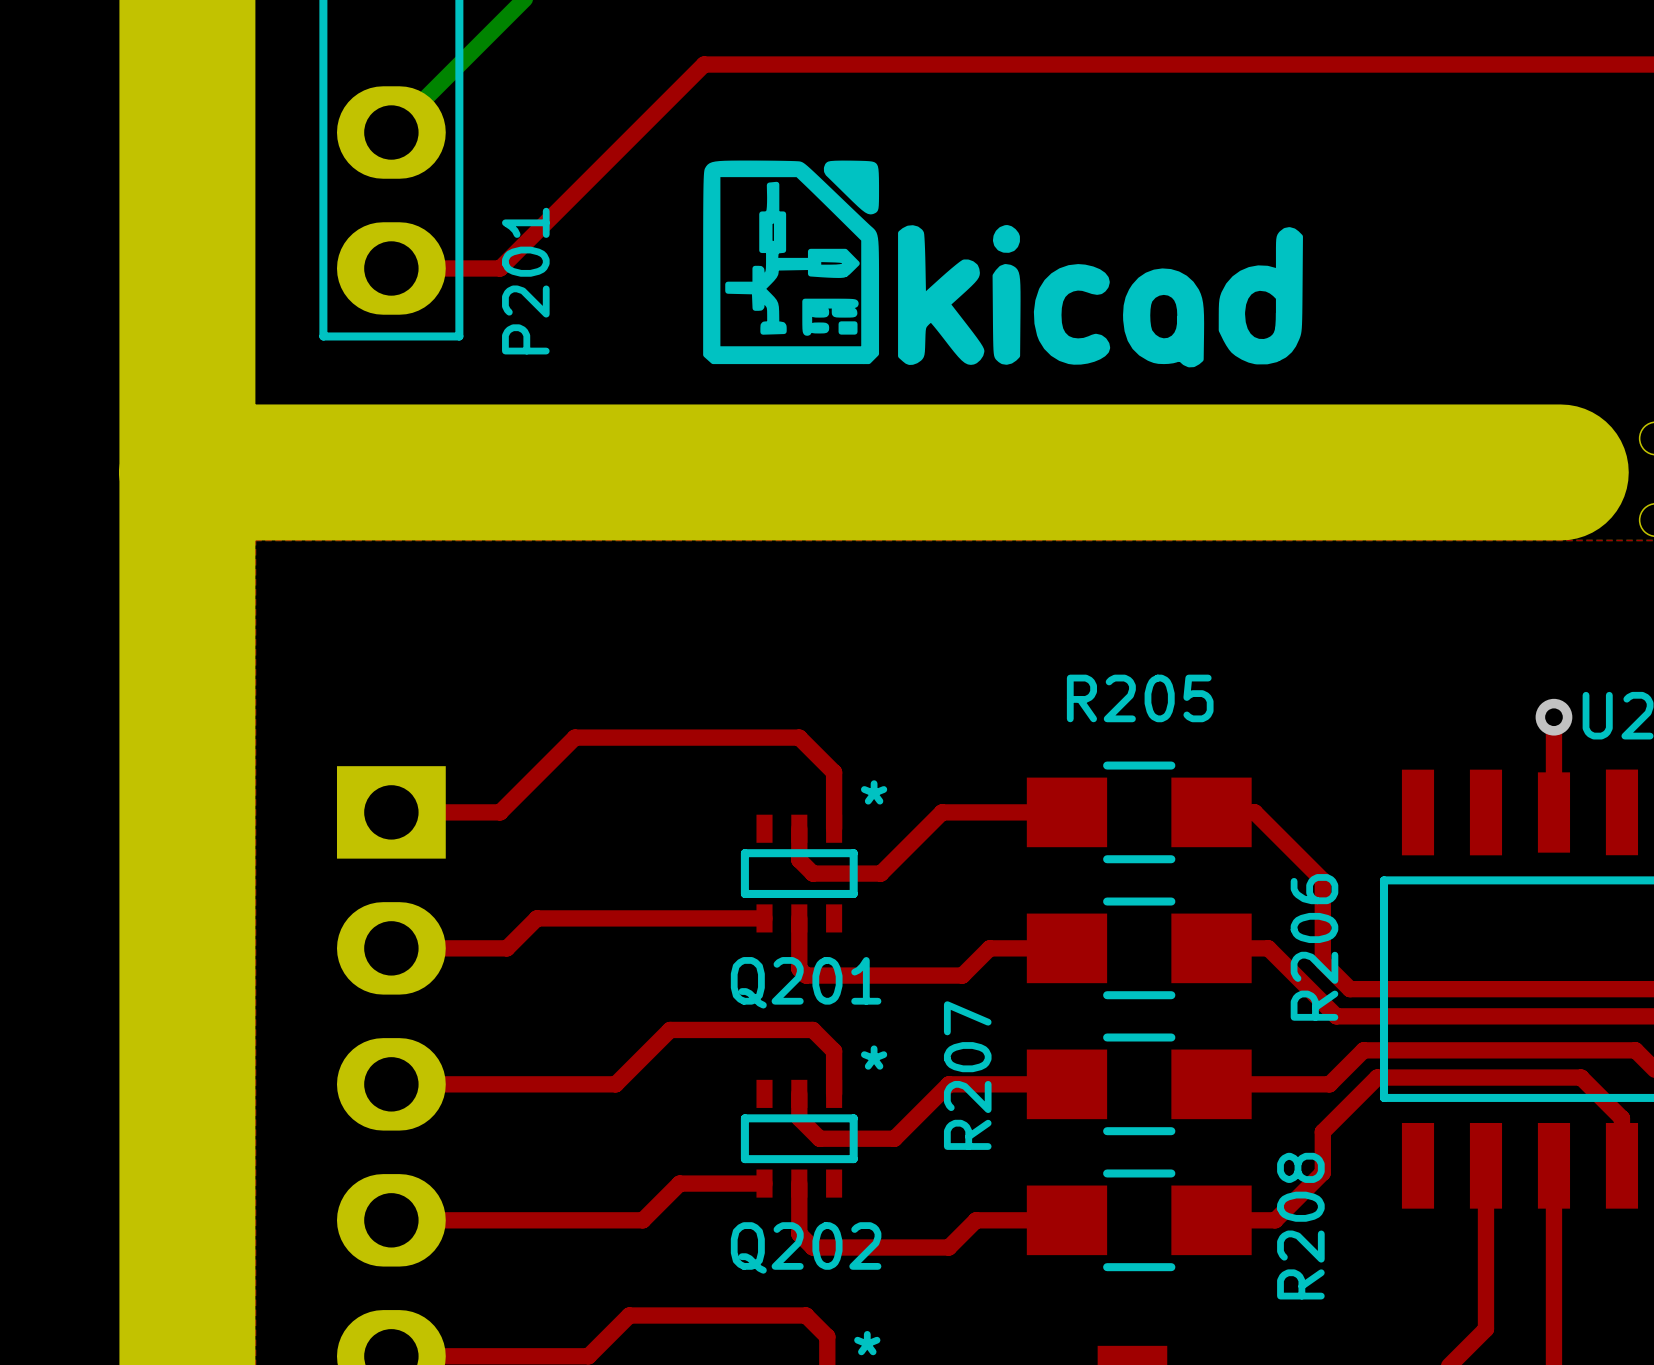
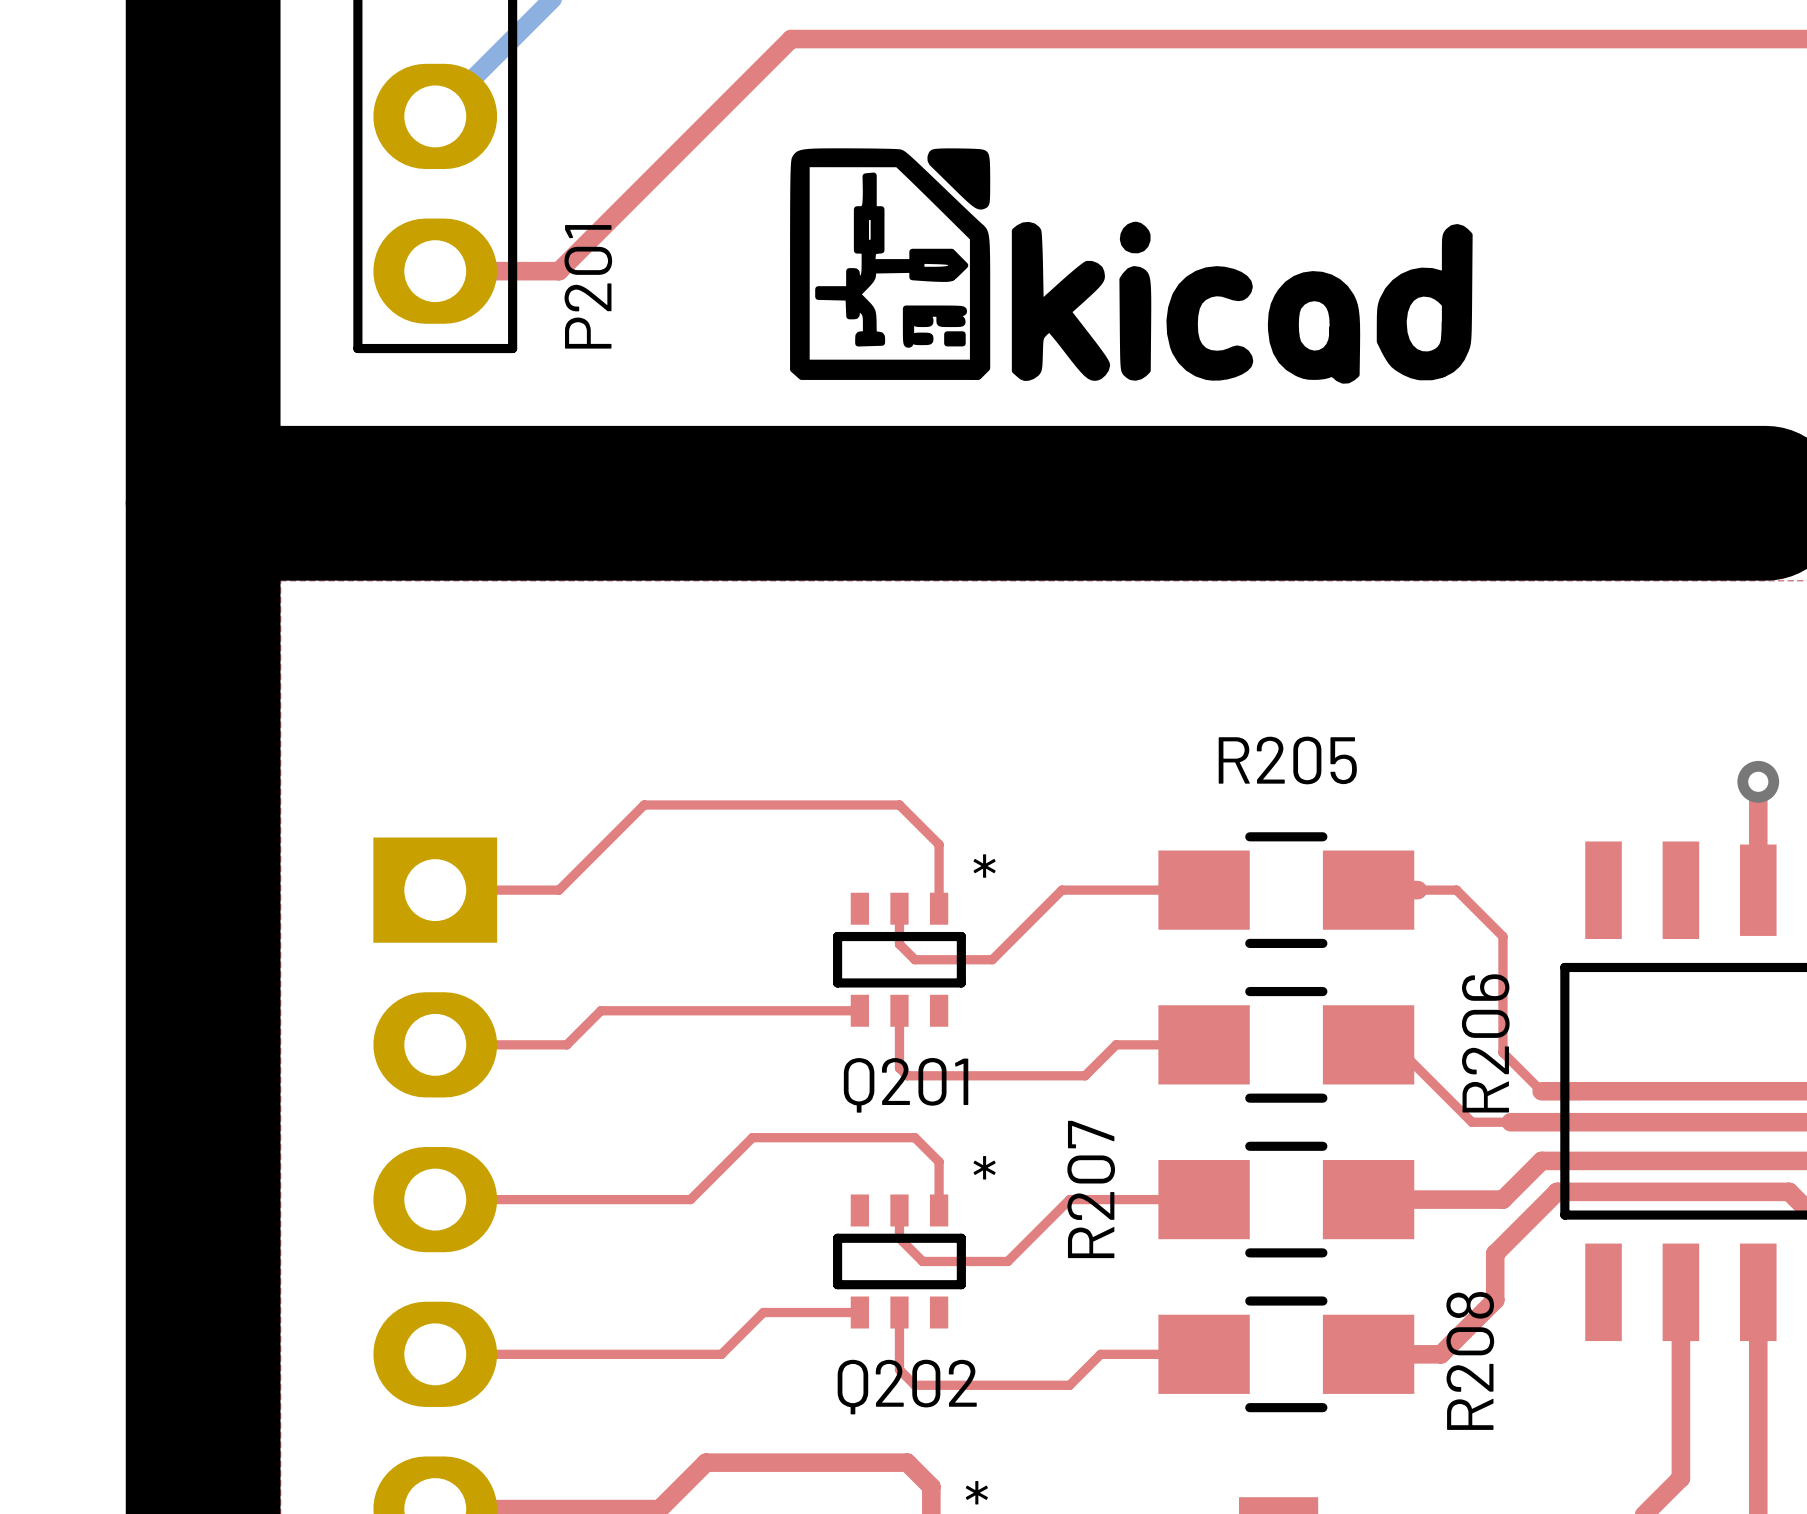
top track width: thick (391, 812) (500, 812) (574, 737) (799, 737) (834, 772) (834, 828) -> thin (435, 890) (559, 890) (644, 805) (899, 805) (939, 844) (939, 908)
top track width: thick (1066, 812) (942, 812) (880, 873) (812, 873) (799, 859) (799, 828) -> thin (1204, 890) (1061, 890) (992, 959) (914, 959) (899, 944) (899, 908)
top track: (1254, 812) (1322, 880) (1322, 961) (1350, 989) (1363, 989) -> (1417, 890) (1456, 890) (1502, 936) (1502, 1052) (1541, 1091)
top track width: thick (764, 918) (536, 918) (506, 948) (391, 948) -> thin (859, 1010) (600, 1010) (566, 1044) (435, 1044)
top track width: thick (799, 918) (799, 968) (806, 975) (962, 975) (989, 948) (1066, 948) -> thin (899, 1010) (899, 1068) (907, 1075) (1085, 1075) (1116, 1044) (1204, 1044)
top track: (1211, 948) (1268, 948) (1336, 1016) -> (1394, 1044) (1472, 1122) (1510, 1122)
top track width: thick (391, 1084) (615, 1084) (670, 1029) (812, 1029) (834, 1051) (834, 1093) -> thin (435, 1199) (690, 1199) (752, 1137) (914, 1137) (939, 1161) (939, 1210)
top track width: thick (1066, 1084) (948, 1084) (894, 1138) (819, 1138) (799, 1118) (799, 1093) -> thin (1204, 1199) (1069, 1199) (1007, 1261) (922, 1261) (899, 1238) (899, 1210)
top track width: thick (764, 1183) (679, 1183) (642, 1220) (391, 1220) -> thin (859, 1312) (763, 1312) (721, 1354) (435, 1354)
top track width: thick (799, 1183) (799, 1233) (812, 1247) (948, 1247) (976, 1220) (1066, 1220) -> thin (899, 1312) (899, 1369) (914, 1385) (1069, 1385) (1100, 1354) (1204, 1354)

